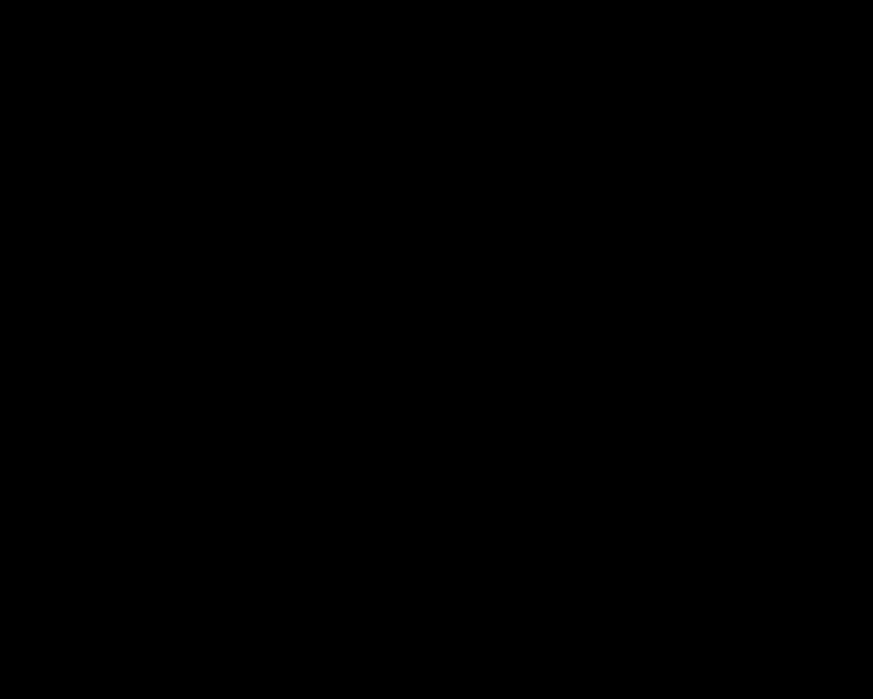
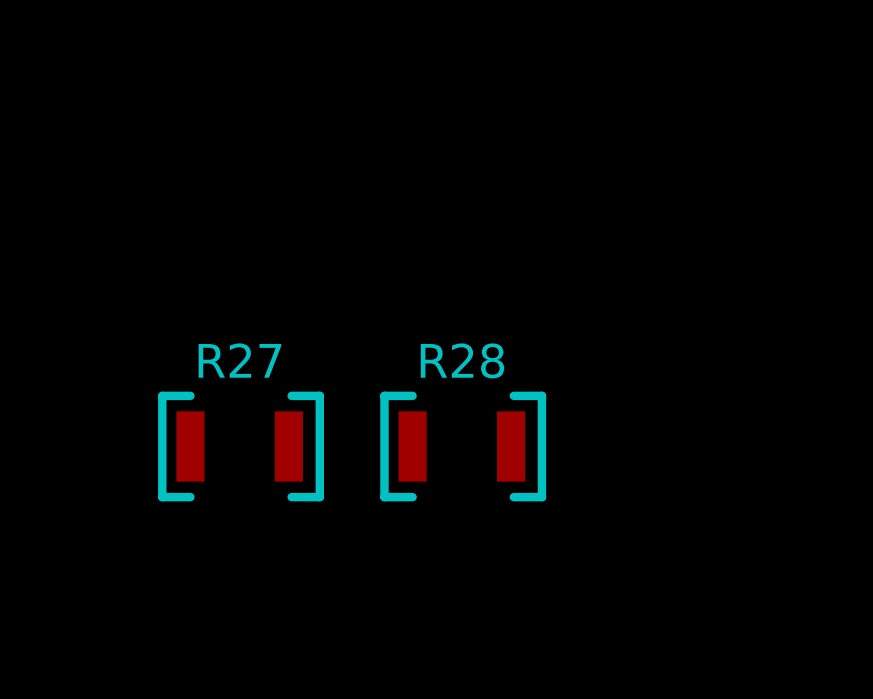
R27: none -> (241, 446)
R28: none -> (463, 446)

